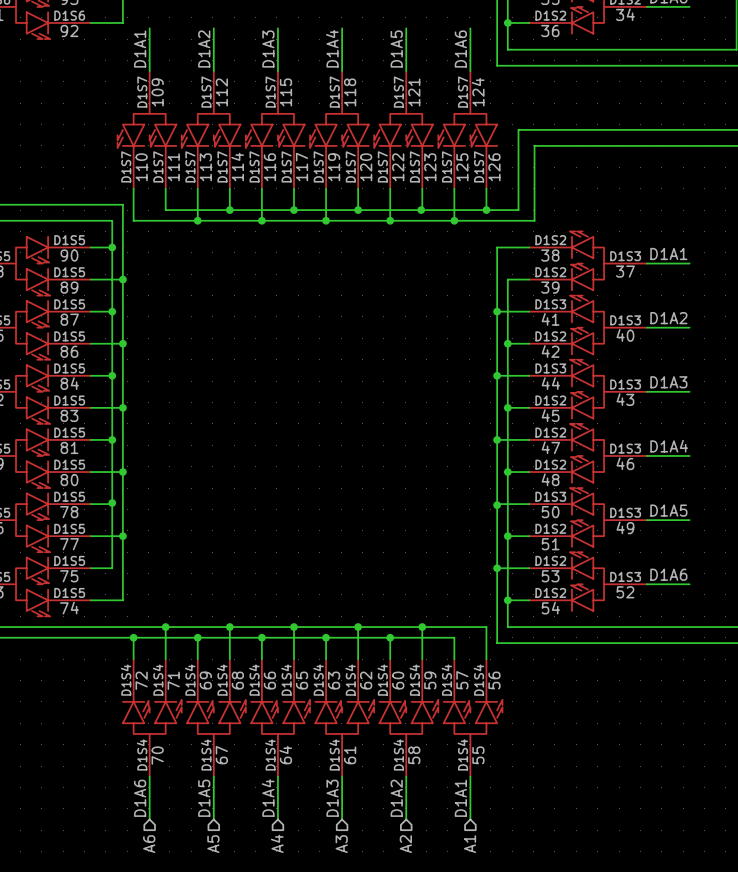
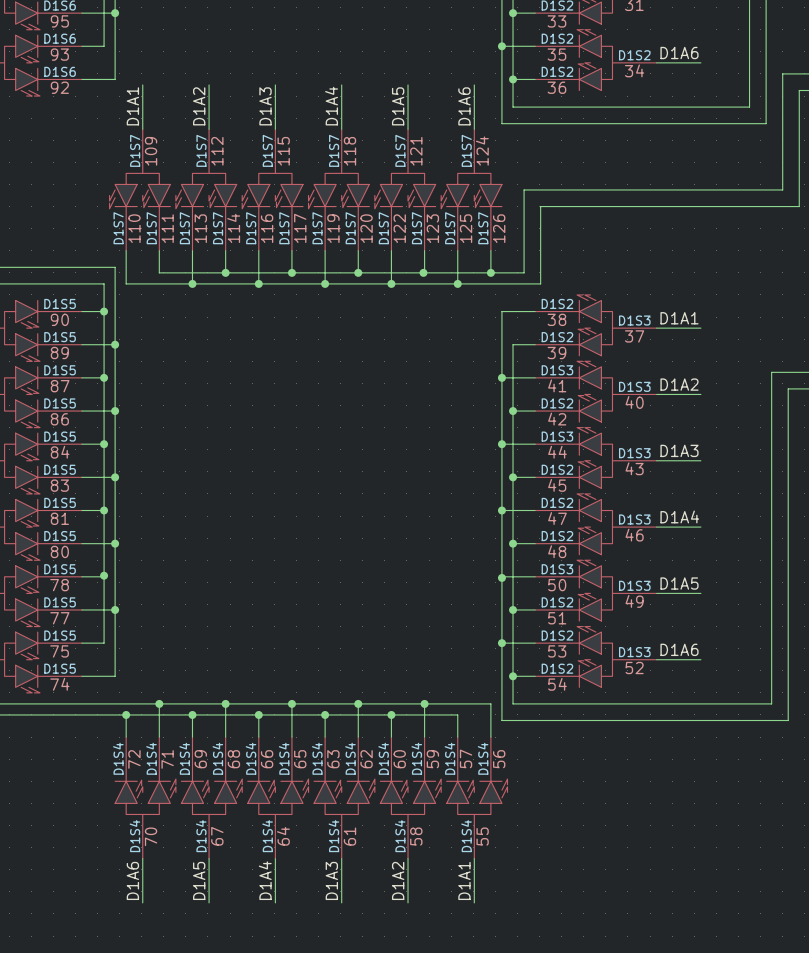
hierarchical label: A4 (277, 843) -> none
hierarchical label: A6 (149, 844) -> none
hierarchical label: A5 (213, 844) -> none
hierarchical label: A3 (341, 844) -> none
hierarchical label: A2 (405, 844) -> none
hierarchical label: A1 (470, 844) -> none

